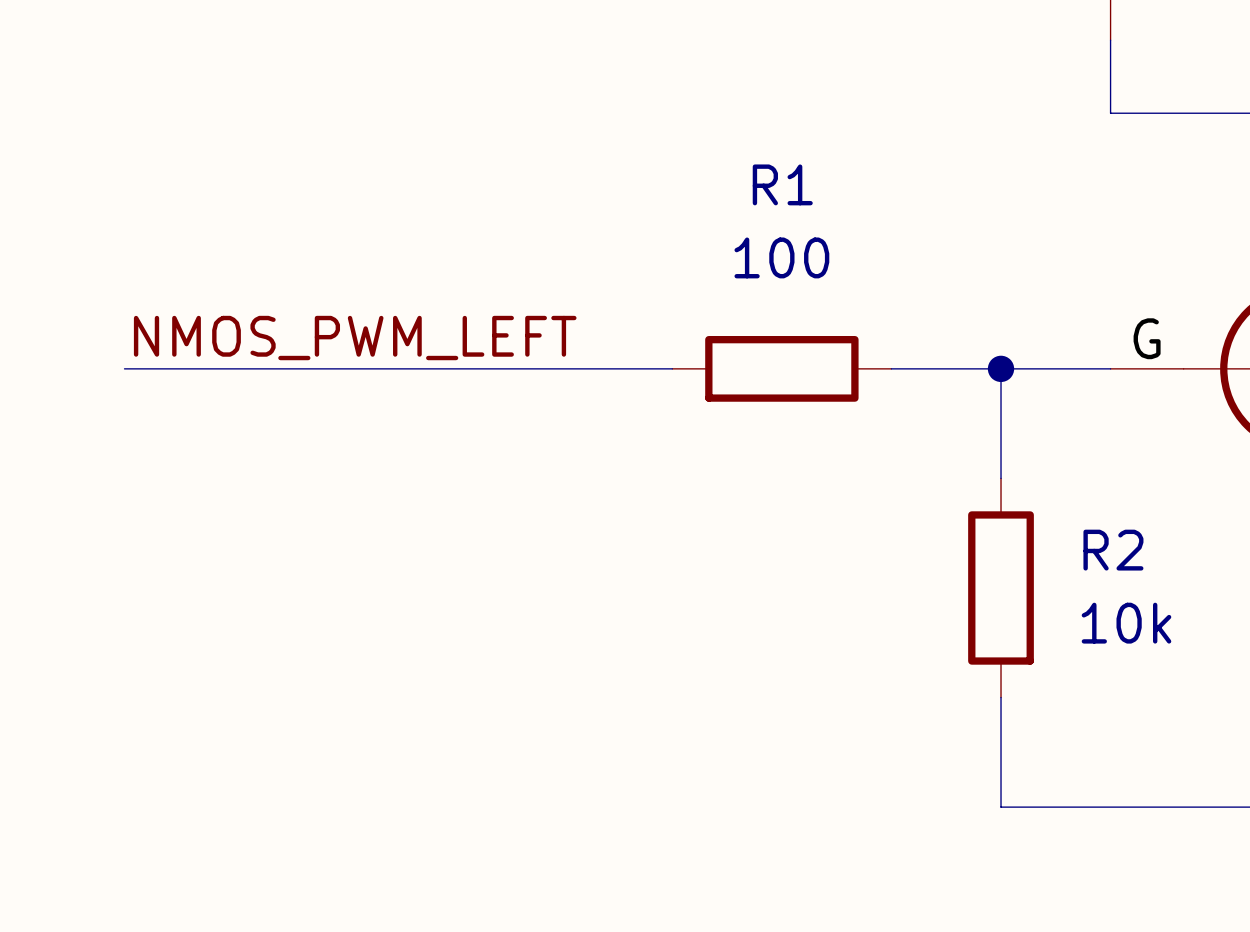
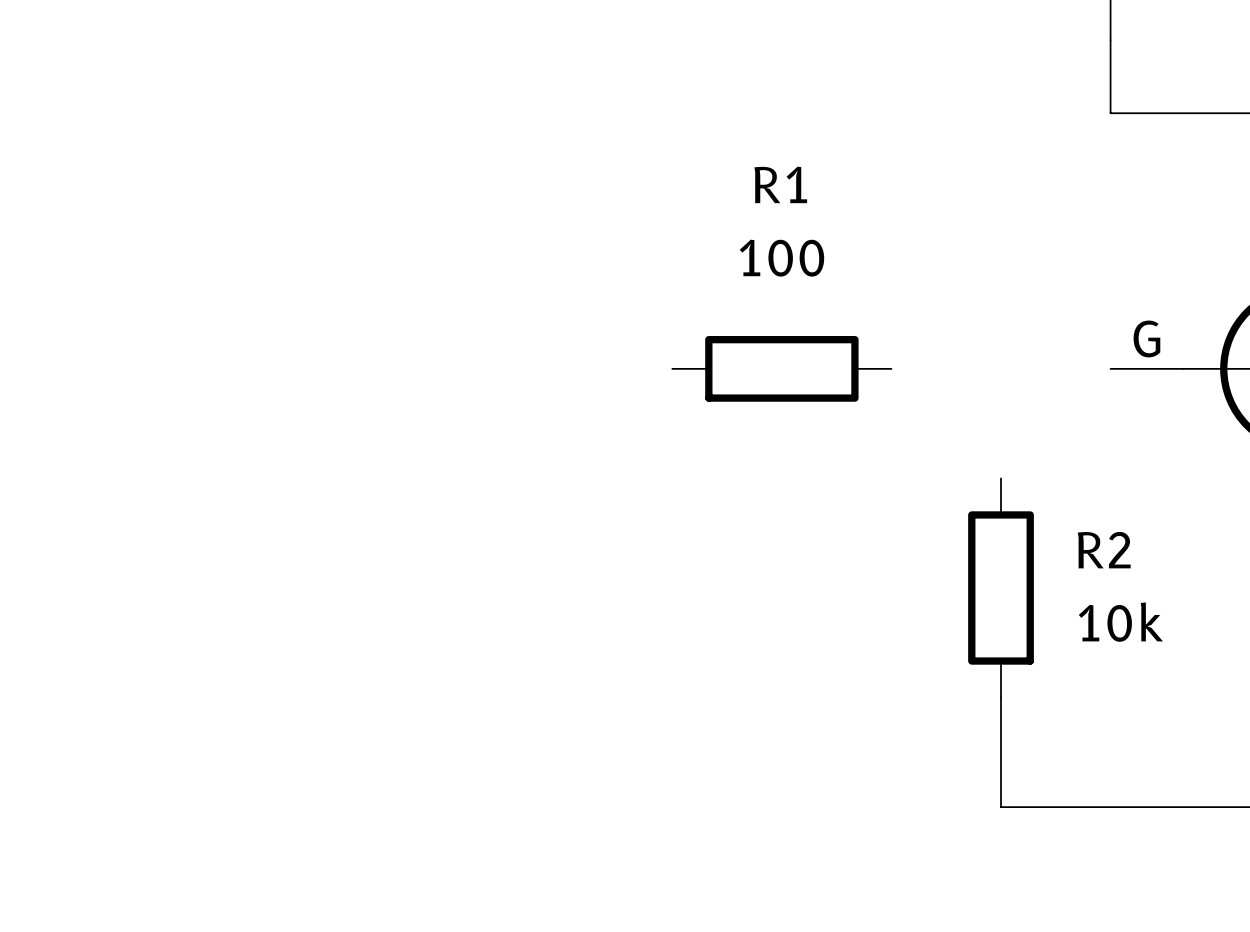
label: NMOS_PWM_LEFT (355, 338) -> none
wire: (124, 368) (672, 368) -> none
wire: (891, 368) (1110, 368) -> none
wire: (1001, 368) (1001, 478) -> none
junction: (1001, 368) -> none

